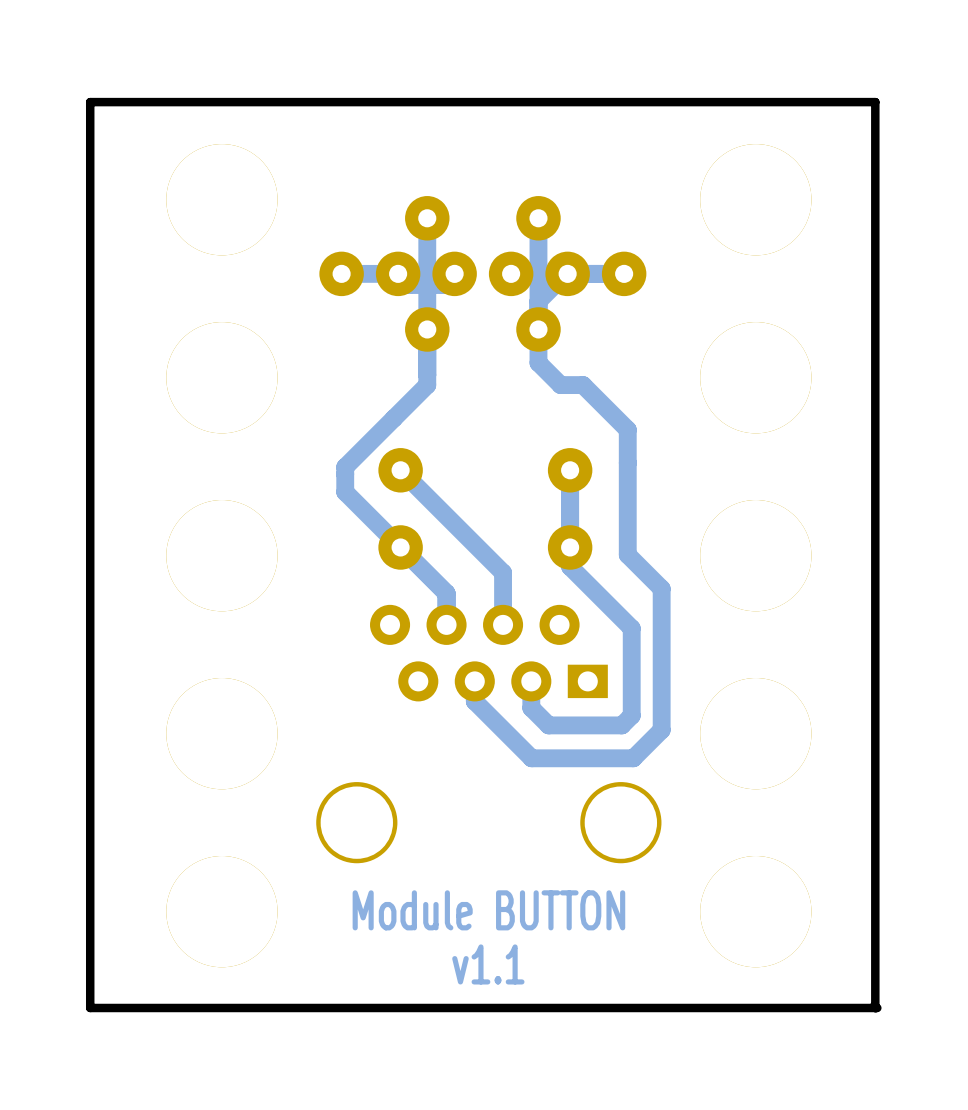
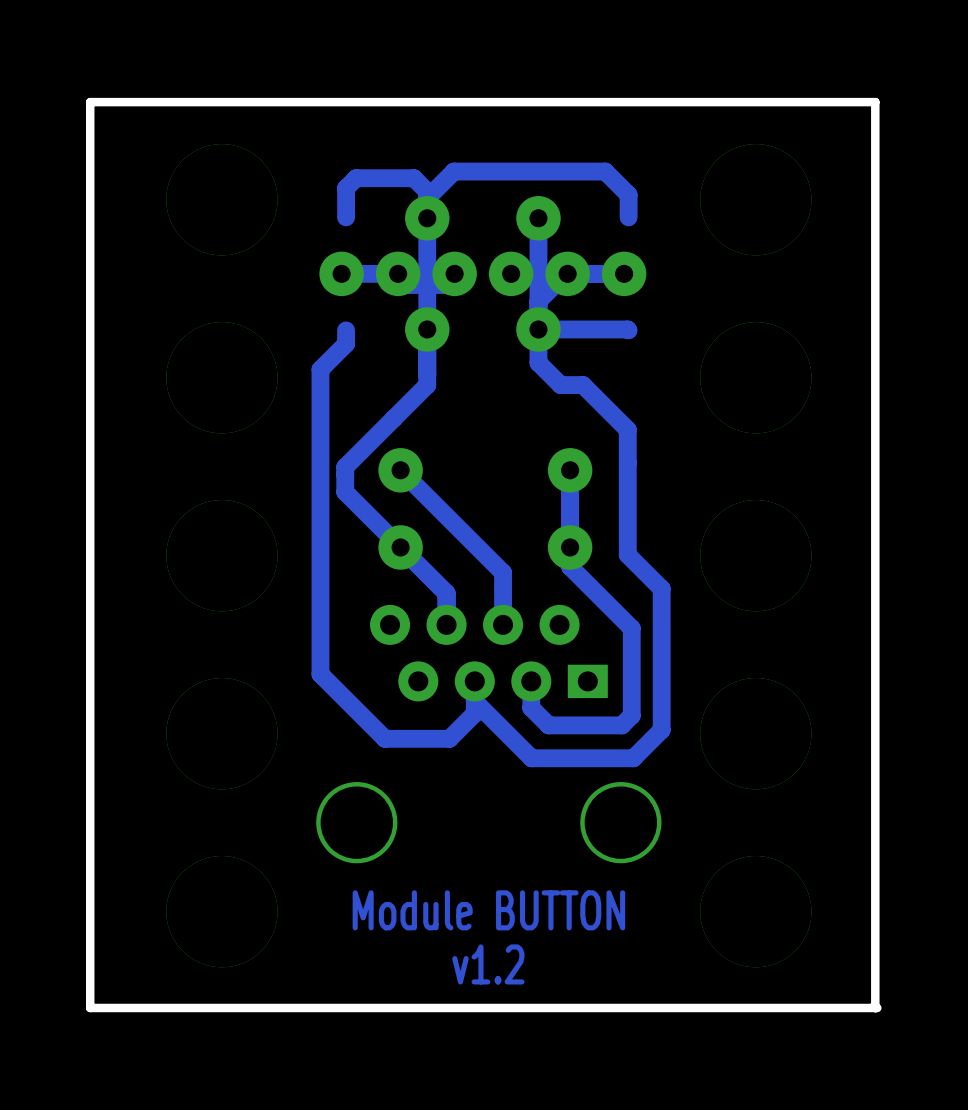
track: none -> (427, 198) (453, 171) (605, 171) (628, 194) (628, 217)
track: none -> (346, 217) (346, 188) (356, 178) (413, 178) (427, 191) (427, 218)
track: none -> (538, 329) (628, 330)
track: none -> (346, 330) (346, 343) (320, 369) (320, 674) (385, 738) (449, 738) (474, 713) (474, 701)
text: v1.1 (488, 964) -> v1.2 (488, 964)

